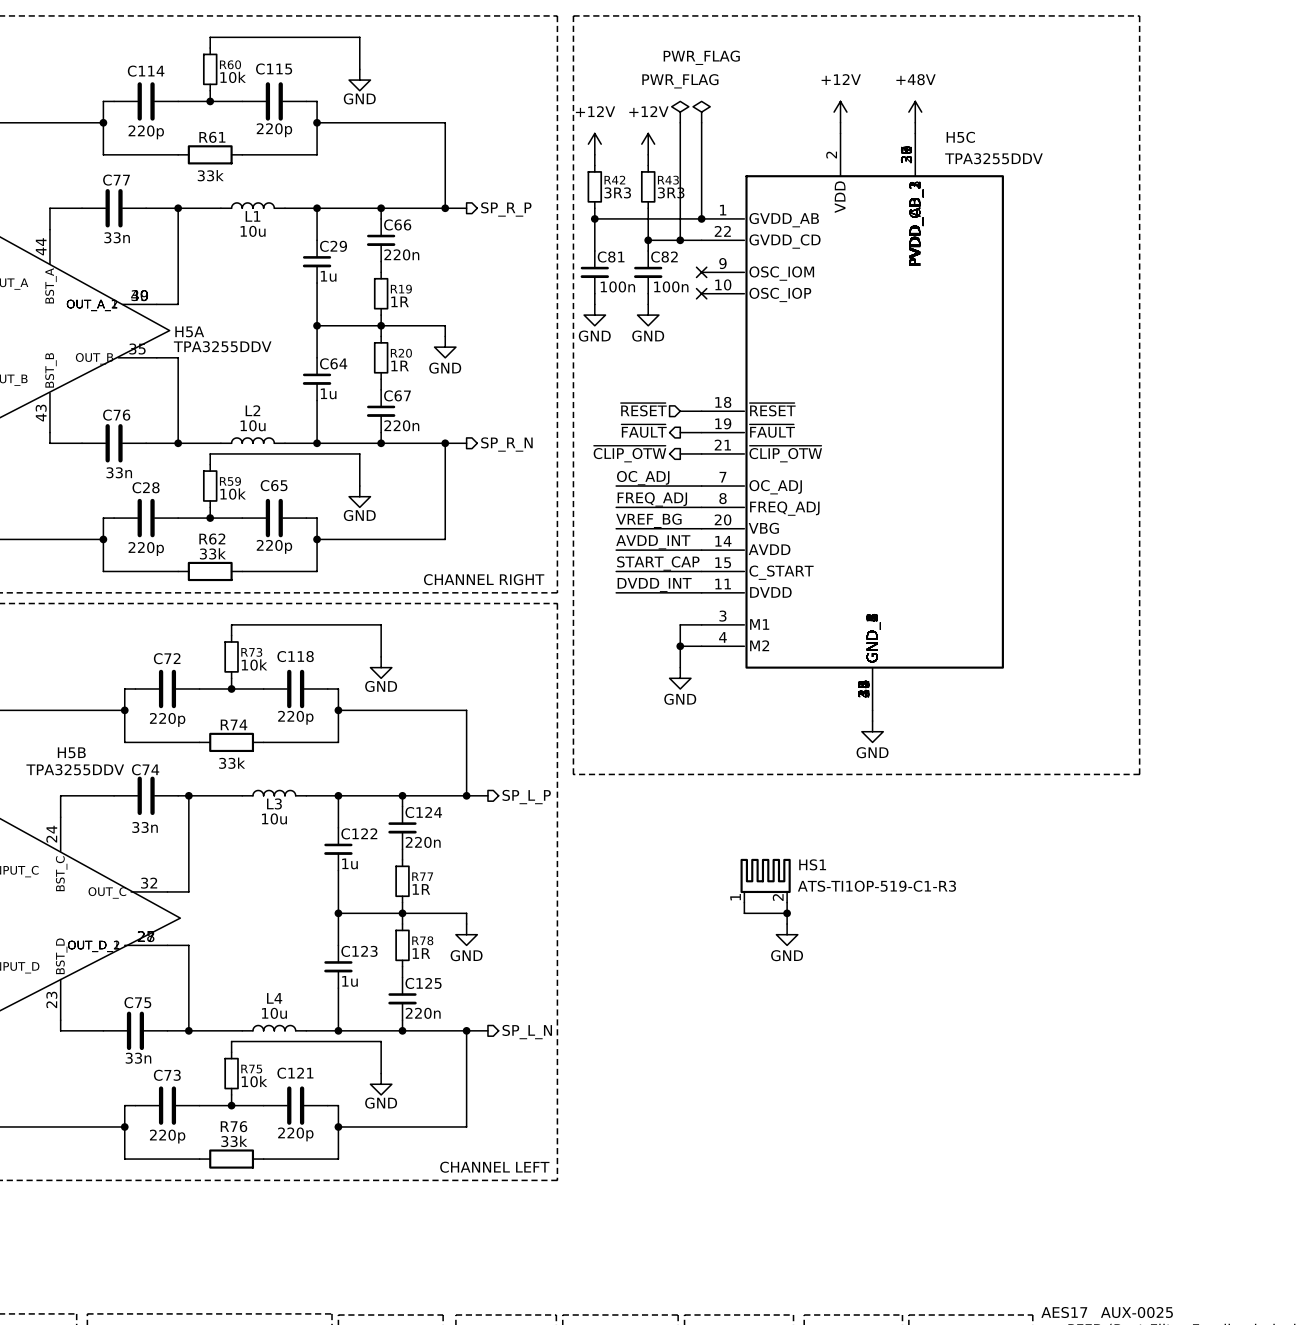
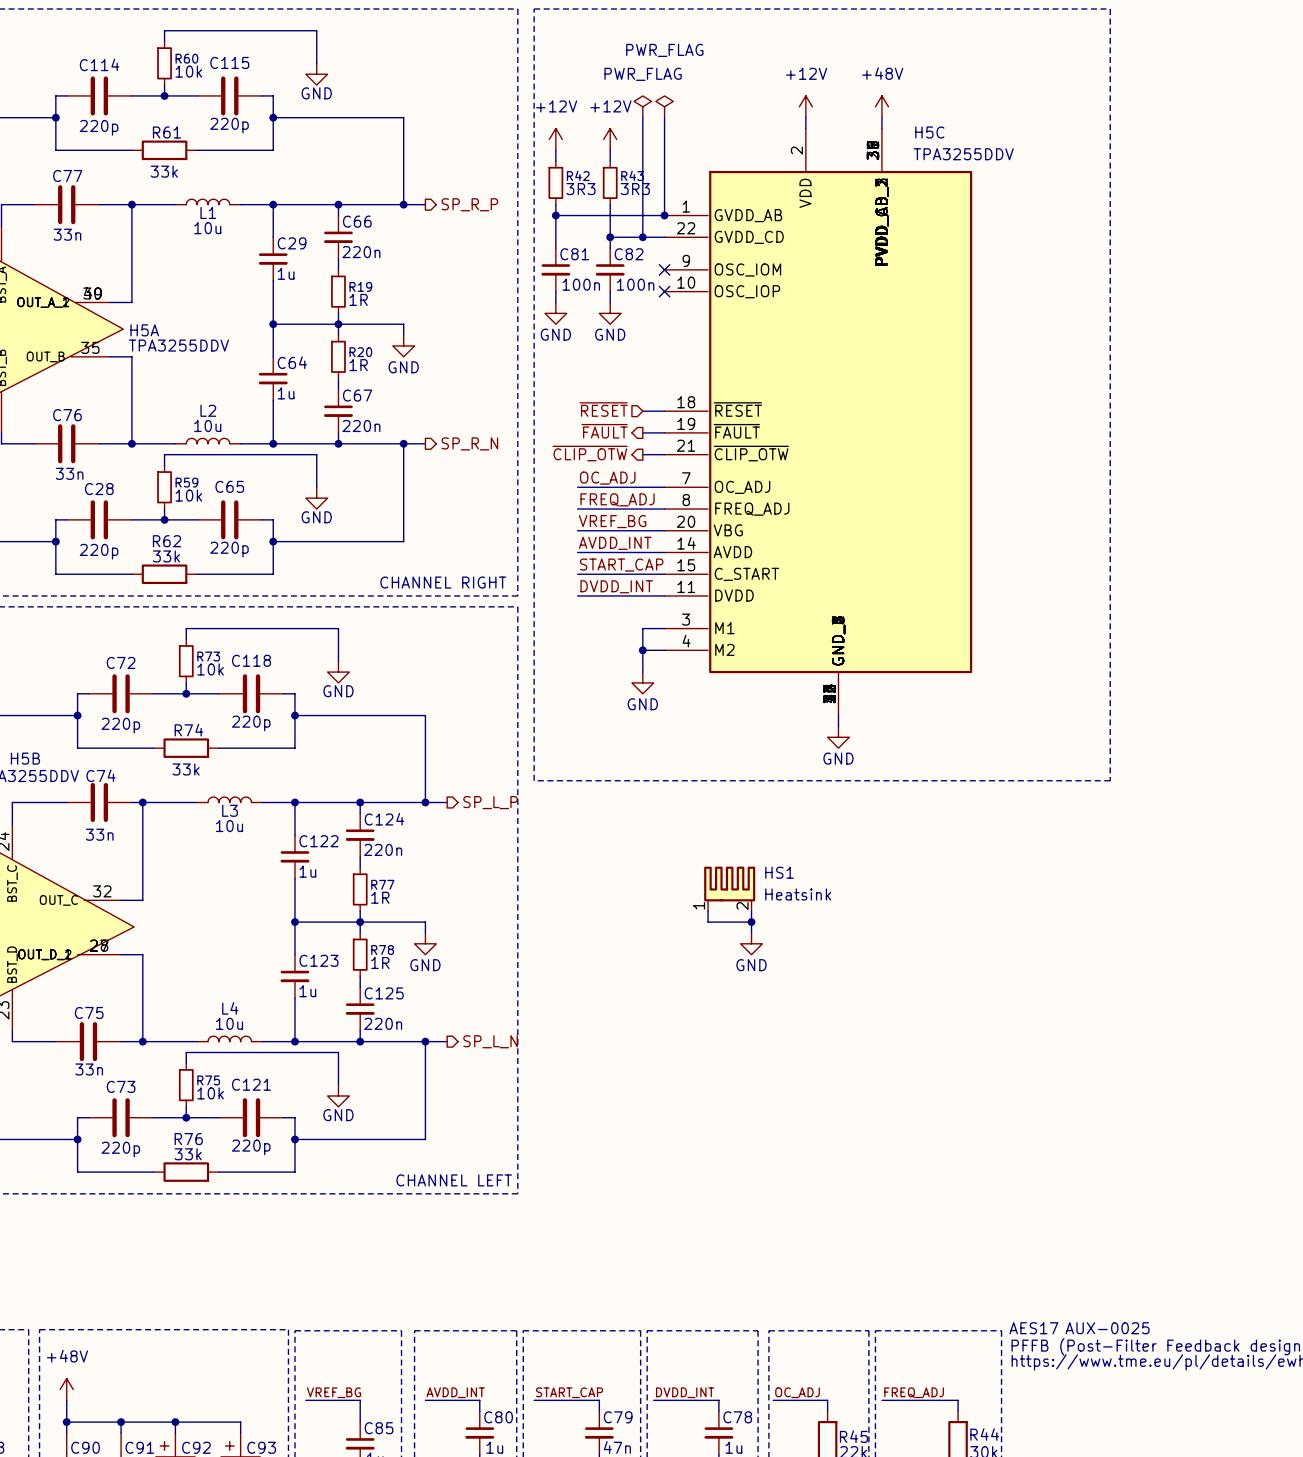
HS1 value: ATS-TI1OP-519-C1-R3 (876, 886) -> Heatsink (798, 894)

